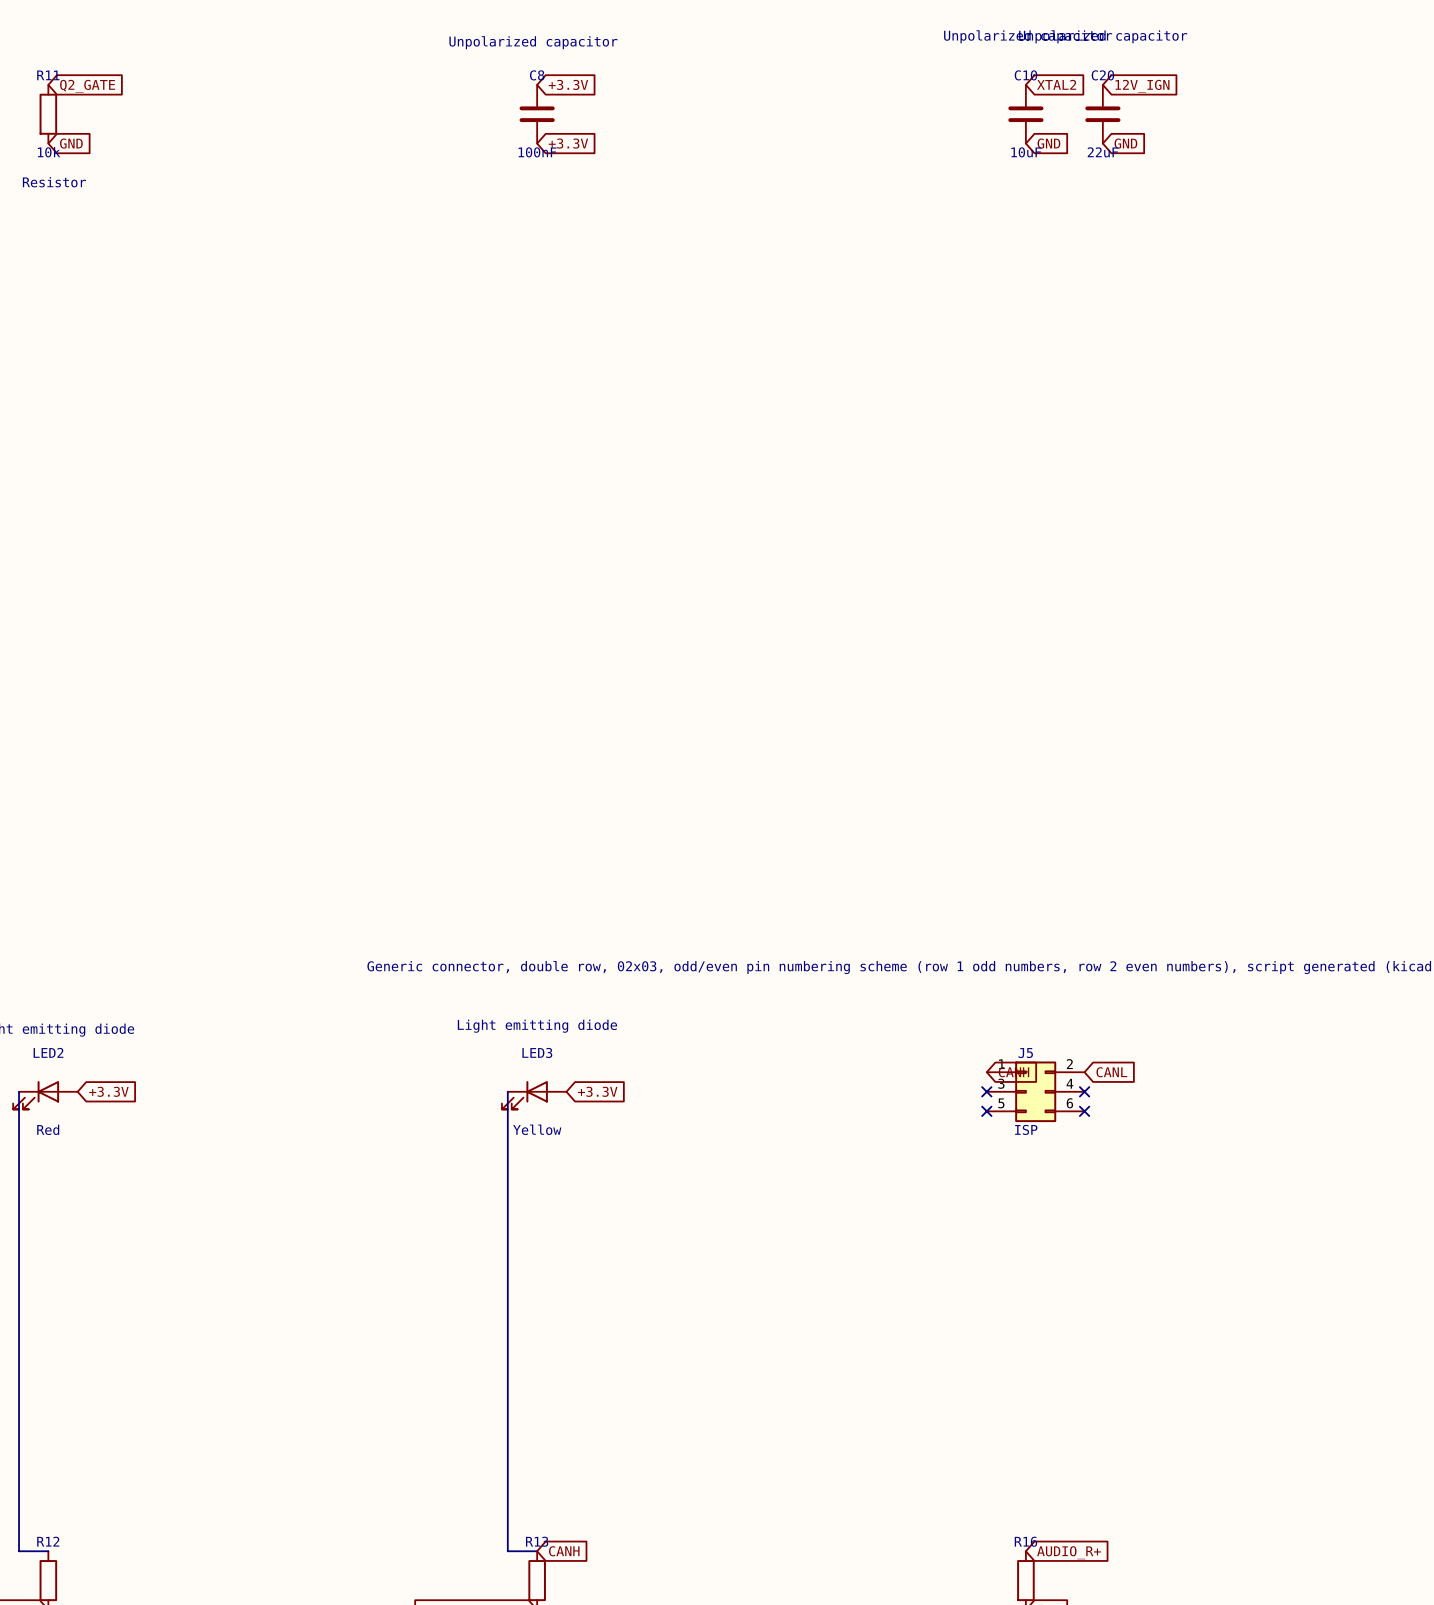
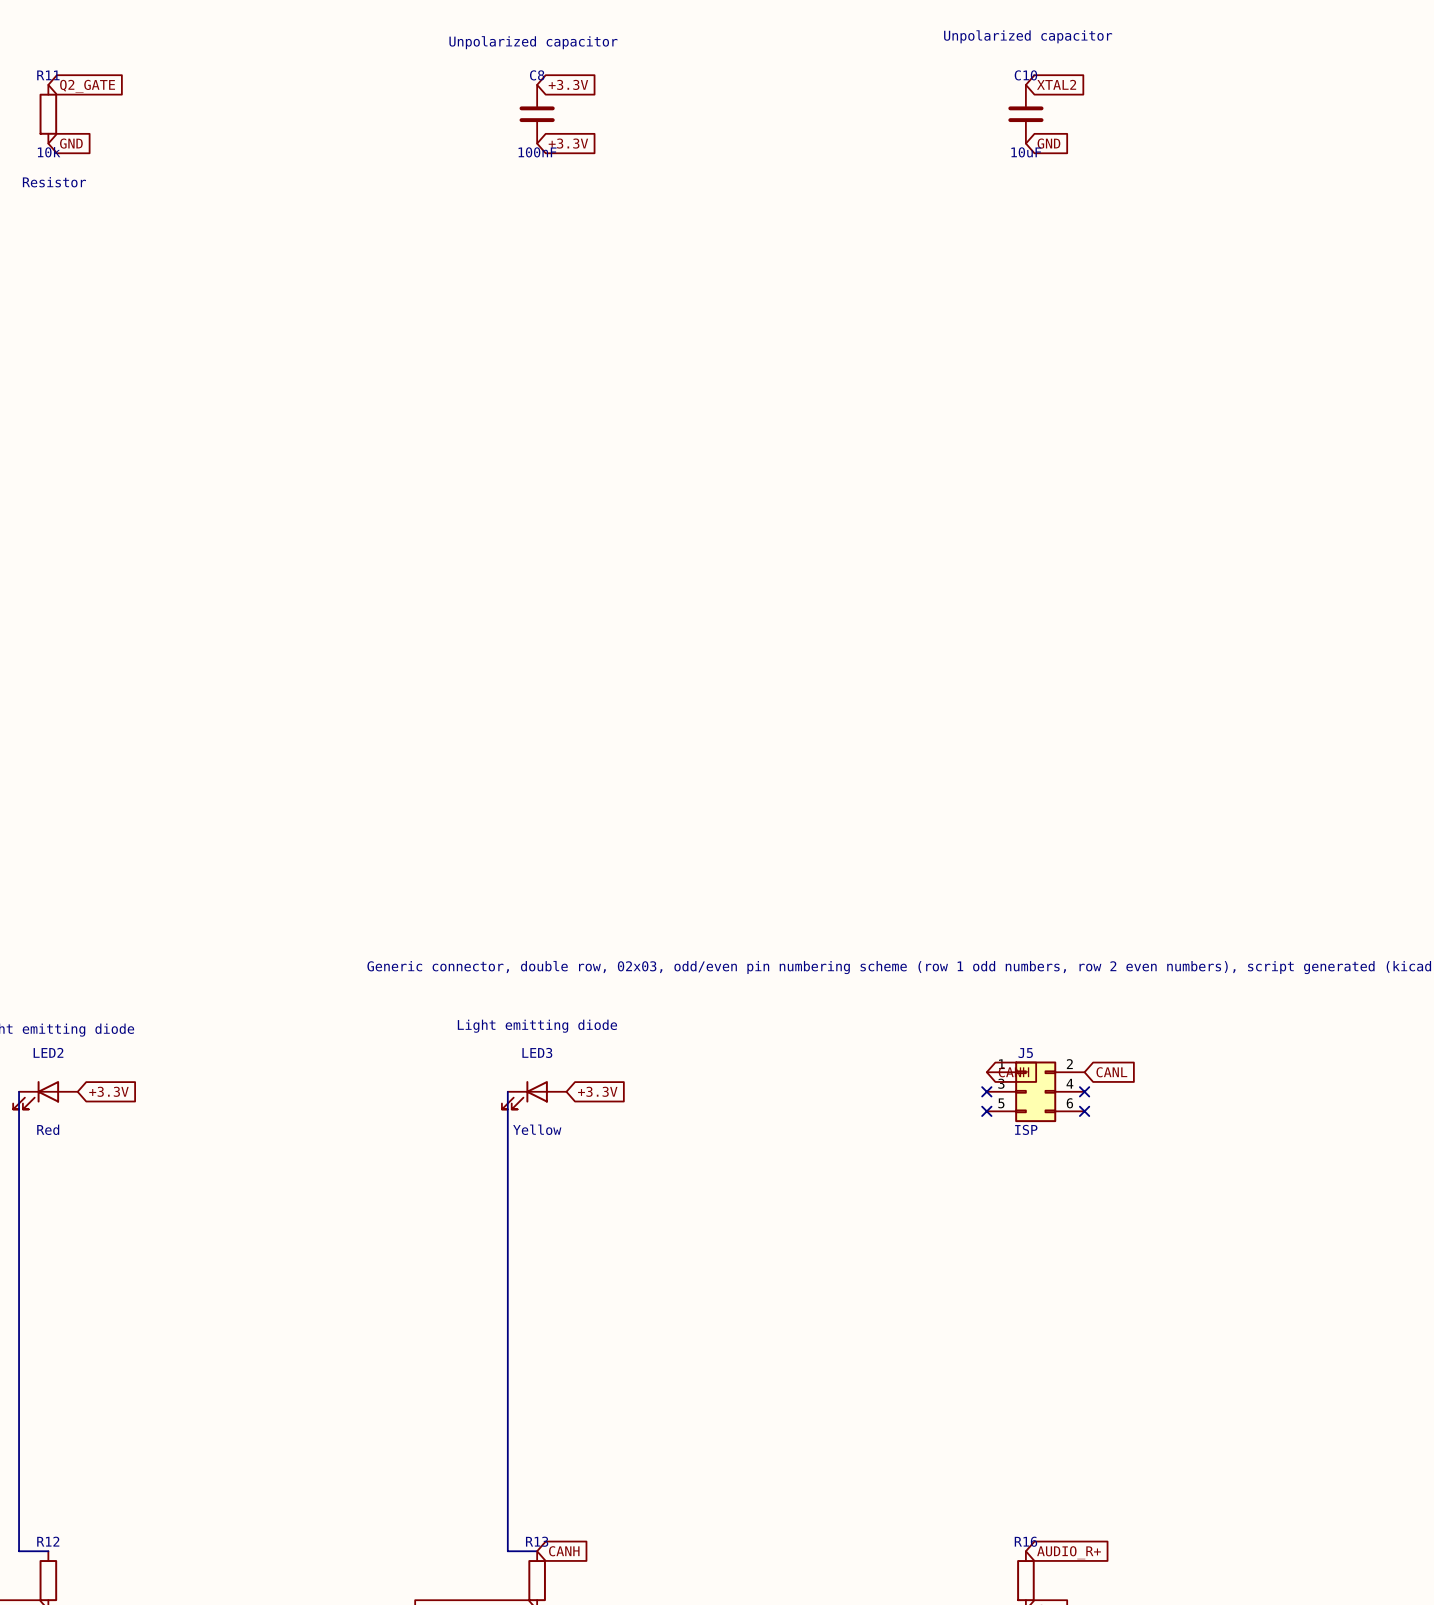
global label: 12V_IGN (1142, 86) -> none
C20: 22uF (1102, 114) -> none
global label: GND (1125, 143) -> none

